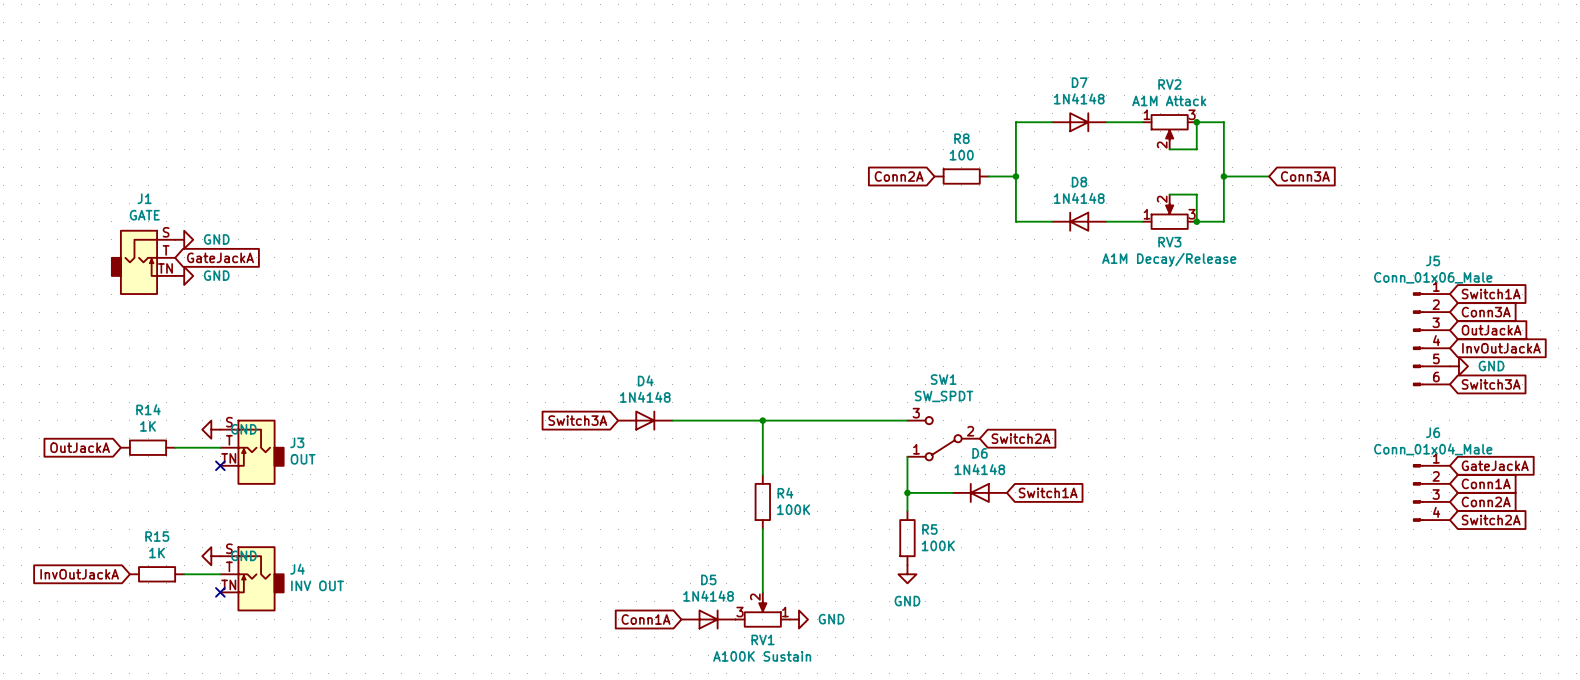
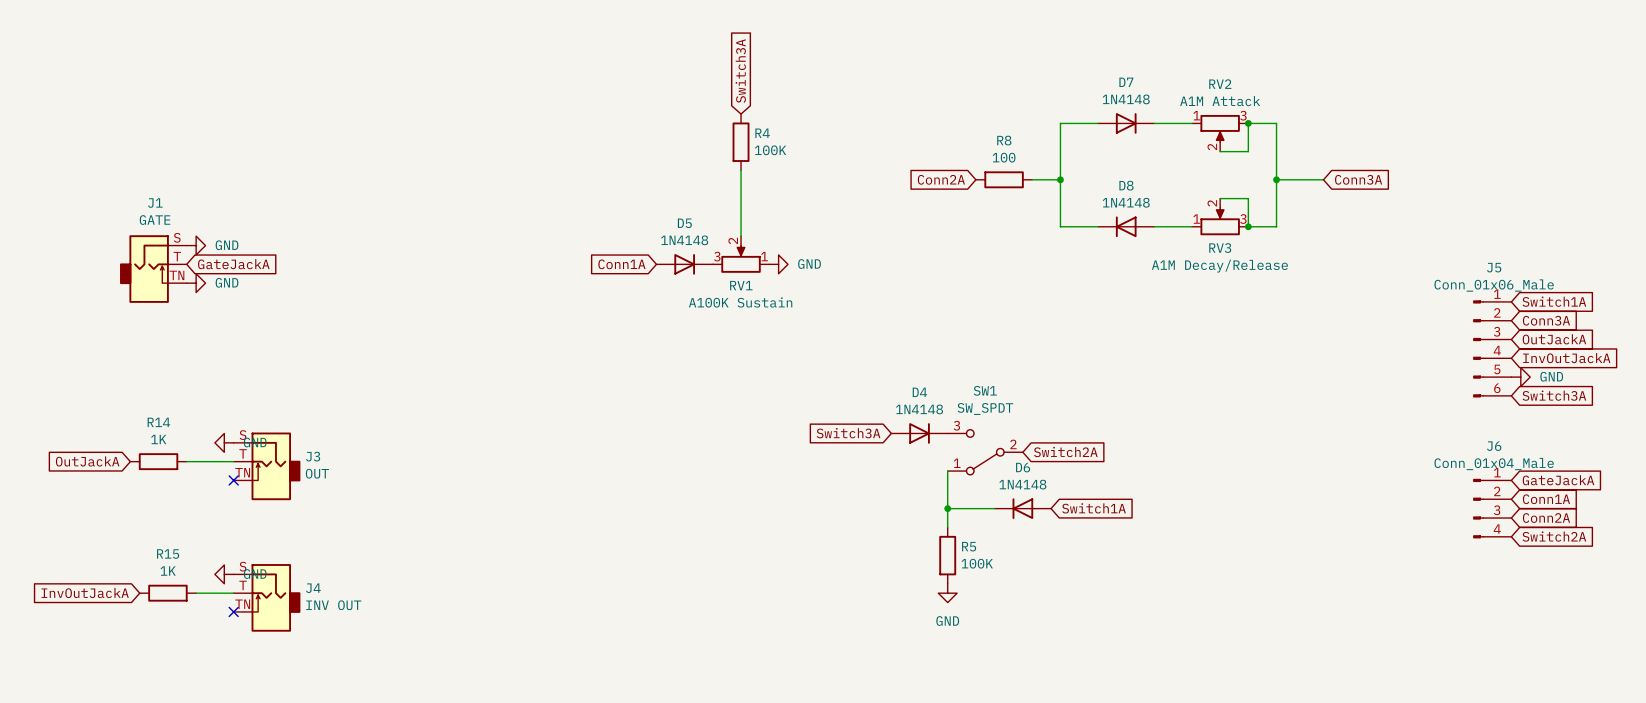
global label: none -> Switch3A (740, 71)
wire: none -> (741, 170) (741, 236)
global label: none -> Conn1A (621, 264)
power symbol: none -> GND (778, 264)
global label: Switch3A (577, 420) -> none
D4 position: (645, 420) -> (919, 433)
wire: (672, 420) (907, 420) -> none
wire: (762, 420) (762, 474) -> none
junction: (762, 420) -> none
global label: none -> Switch3A (848, 433)
R4 position: (762, 501) -> (741, 142)
wire: (762, 529) (762, 592) -> none
RV1 position: (762, 610) -> (741, 254)
global label: Conn1A (646, 619) -> none
D5 position: (708, 619) -> (684, 264)
power symbol: GND (798, 619) -> none

